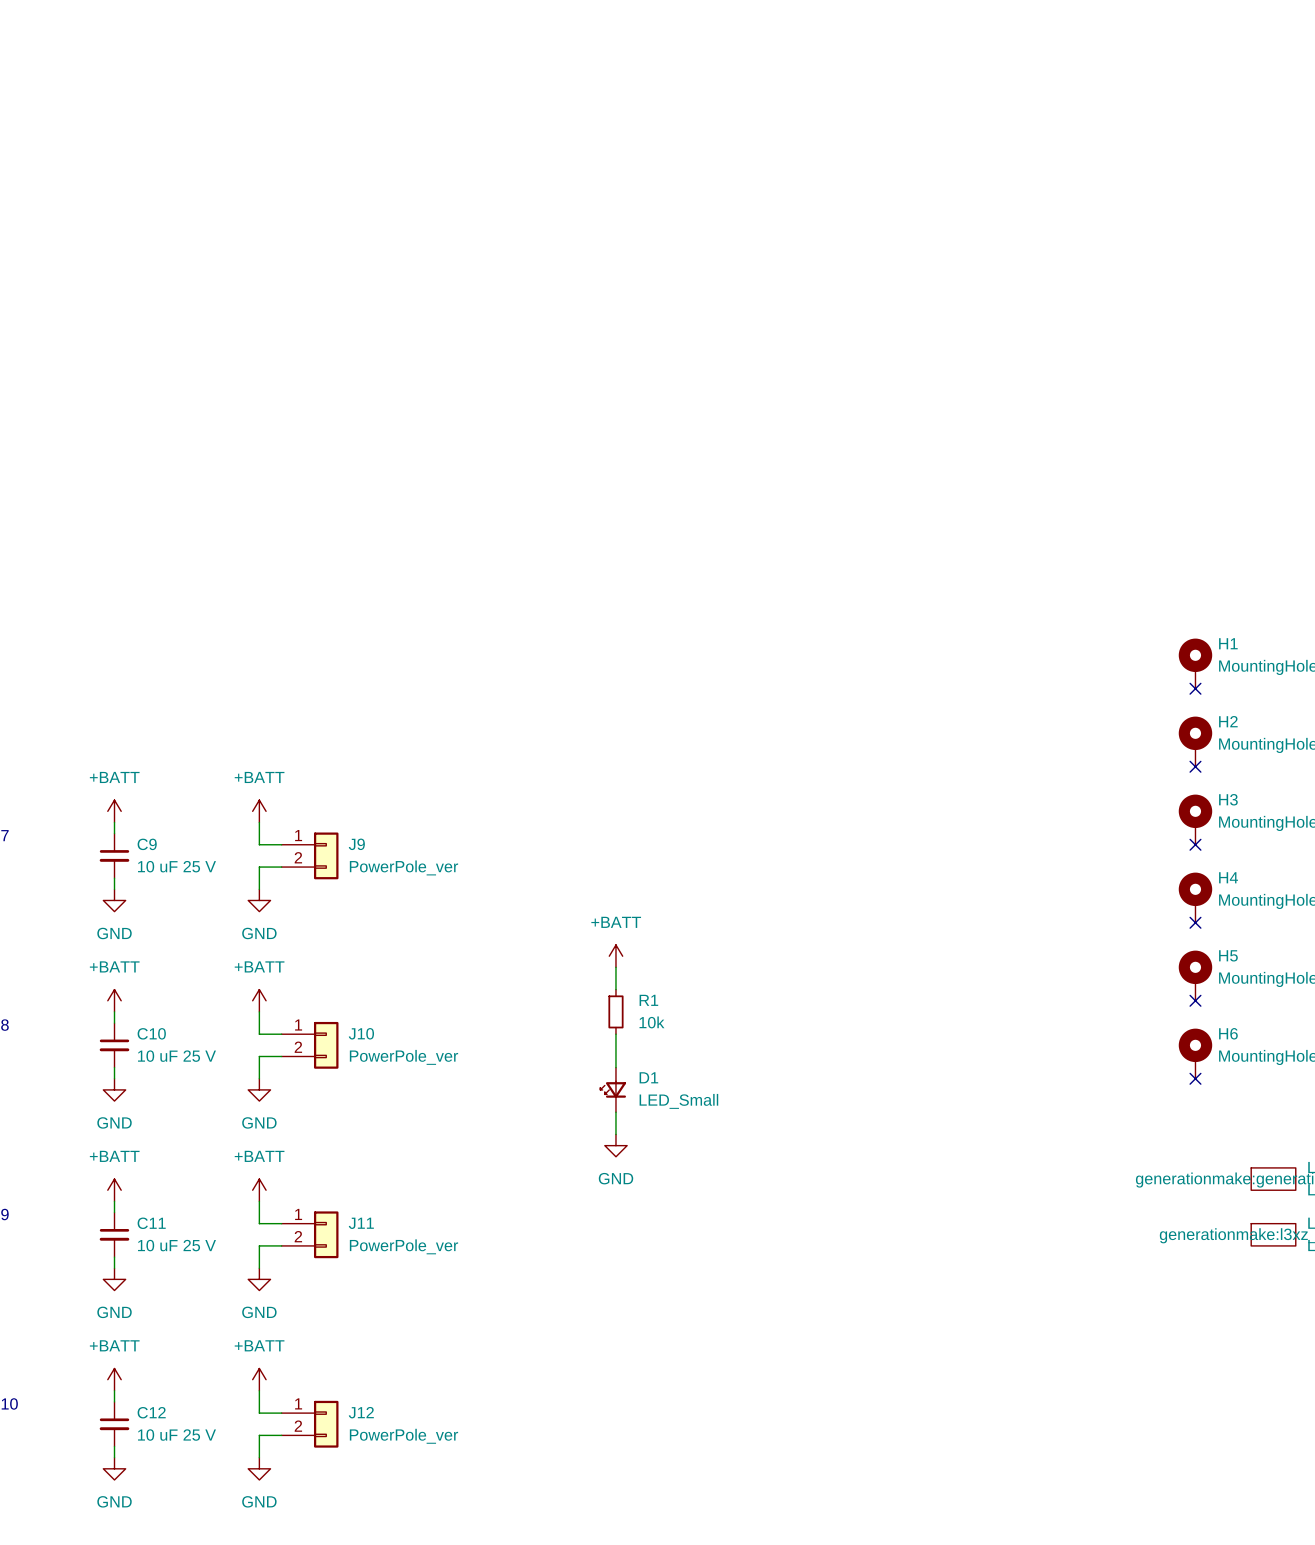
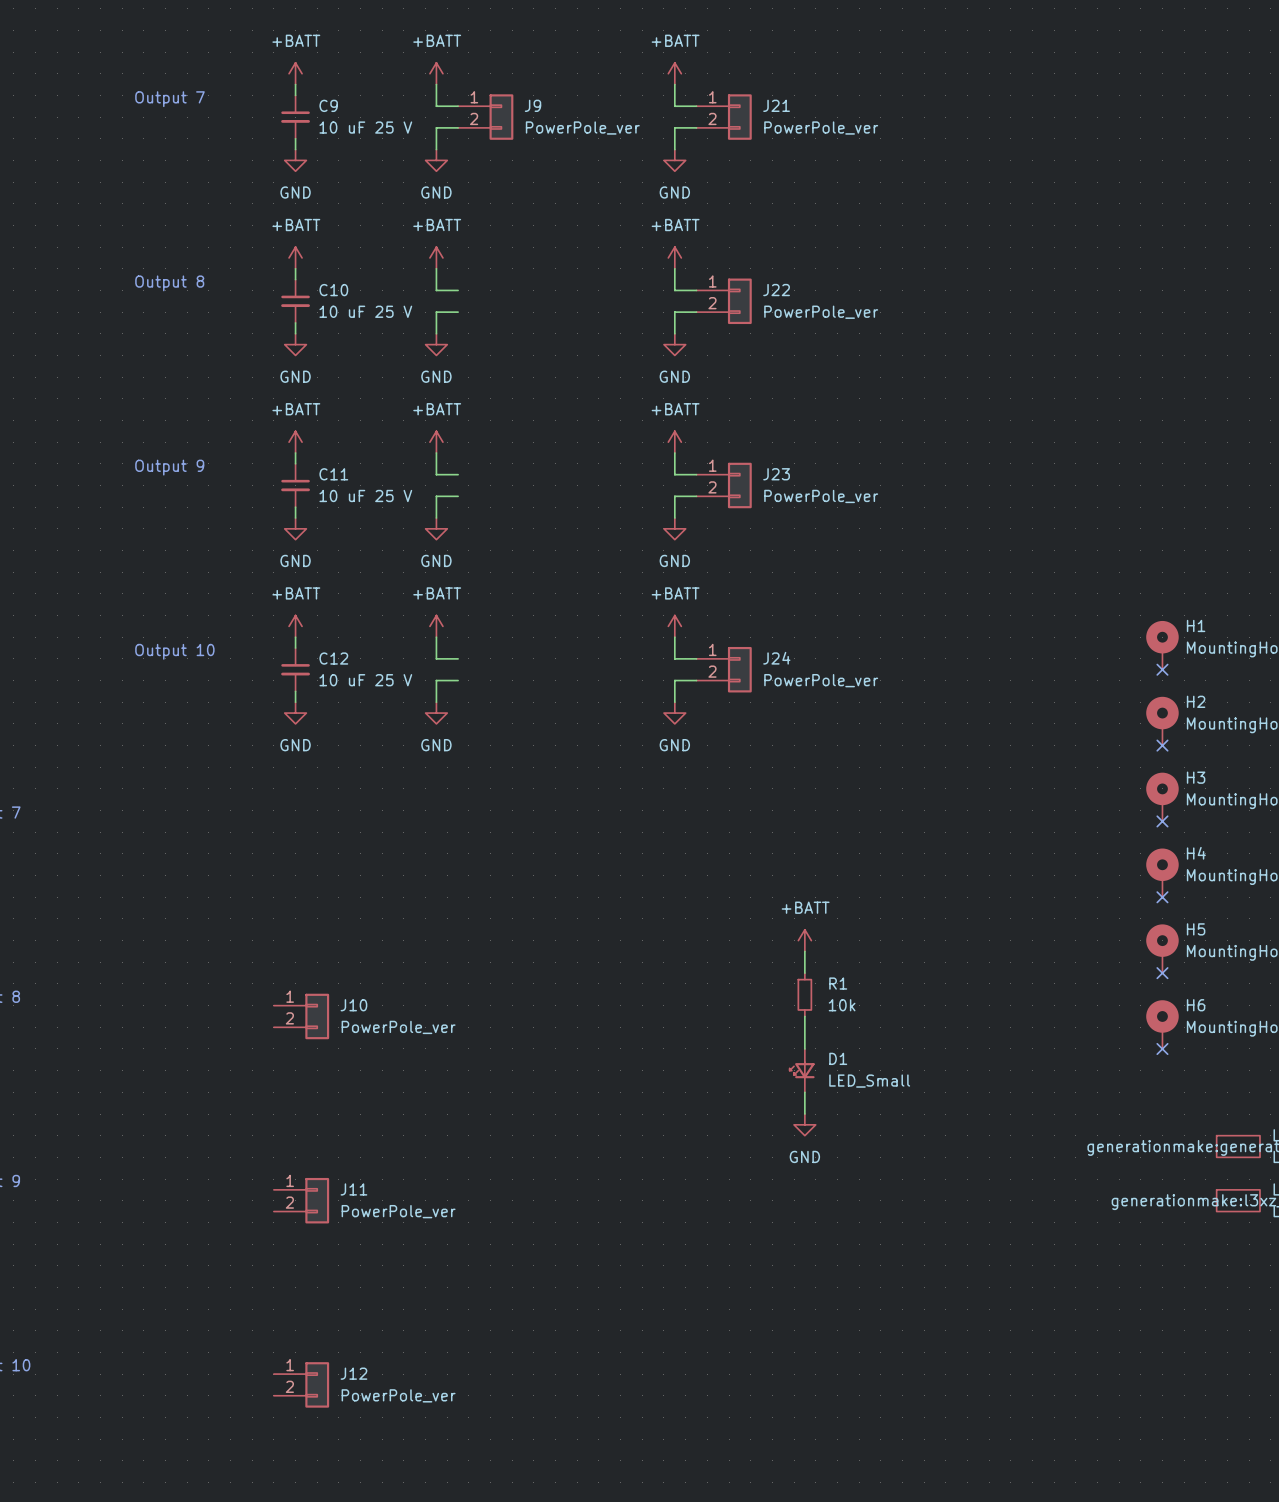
power symbol: none -> +BATT (295, 73)
power symbol: none -> +BATT (436, 73)
power symbol: none -> +BATT (674, 73)
wire: none -> (295, 84) (295, 95)
wire: none -> (436, 84) (436, 106) (458, 106)
wire: none -> (674, 84) (674, 106) (696, 106)
text: none -> Output 7 (169, 99)
J21: none -> PowerPole_ver (724, 117)
wire: none -> (458, 127) (436, 127) (436, 149)
wire: none -> (696, 127) (674, 127) (674, 149)
wire: none -> (295, 138) (295, 149)
power symbol: none -> GND (295, 160)
power symbol: none -> GND (436, 160)
power symbol: none -> GND (674, 160)
power symbol: none -> +BATT (295, 257)
power symbol: none -> +BATT (436, 257)
power symbol: none -> +BATT (674, 257)
wire: none -> (295, 268) (295, 279)
wire: none -> (436, 268) (436, 290) (458, 290)
wire: none -> (674, 268) (674, 290) (696, 290)
text: none -> Output 8 (169, 283)
J22: none -> PowerPole_ver (724, 301)
wire: none -> (458, 312) (436, 312) (436, 333)
wire: none -> (696, 312) (674, 312) (674, 333)
wire: none -> (295, 322) (295, 333)
power symbol: none -> GND (295, 344)
power symbol: none -> GND (436, 344)
power symbol: none -> GND (674, 344)
power symbol: none -> +BATT (295, 442)
power symbol: none -> +BATT (436, 442)
power symbol: none -> +BATT (674, 442)
wire: none -> (295, 452) (295, 463)
wire: none -> (436, 452) (436, 474) (458, 474)
wire: none -> (674, 452) (674, 474) (696, 474)
text: none -> Output 9 (169, 467)
J23: none -> PowerPole_ver (724, 485)
wire: none -> (458, 496) (436, 496) (436, 518)
wire: none -> (696, 496) (674, 496) (674, 518)
wire: none -> (295, 507) (295, 518)
power symbol: none -> GND (295, 528)
power symbol: none -> GND (436, 528)
power symbol: none -> GND (674, 528)
power symbol: none -> +BATT (295, 626)
power symbol: none -> +BATT (436, 626)
power symbol: none -> +BATT (674, 626)
wire: none -> (295, 637) (295, 648)
wire: none -> (436, 637) (436, 658) (458, 658)
wire: none -> (674, 637) (674, 658) (696, 658)
text: none -> Output 10 (174, 651)
J24: none -> PowerPole_ver (724, 669)
wire: none -> (458, 680) (436, 680) (436, 702)
wire: none -> (696, 680) (674, 680) (674, 702)
wire: none -> (295, 691) (295, 702)
power symbol: none -> GND (295, 713)
power symbol: none -> GND (436, 713)
power symbol: none -> GND (674, 713)
power symbol: +BATT (114, 811) -> none
power symbol: +BATT (259, 811) -> none
wire: (114, 822) (114, 833) -> none
wire: (259, 822) (259, 844) (281, 844) -> none
C9 position: (114, 855) -> (295, 117)
J9 position: (310, 855) -> (485, 117)
wire: (281, 867) (259, 867) (259, 889) -> none
wire: (114, 878) (114, 889) -> none
power symbol: GND (114, 900) -> none
power symbol: GND (259, 900) -> none
power symbol: +BATT (615, 956) -> none
wire: (615, 967) (615, 989) -> (804, 951) (804, 973)
power symbol: none -> +BATT (804, 940)
power symbol: +BATT (114, 1000) -> none
power symbol: +BATT (259, 1000) -> none
wire: (114, 1011) (114, 1023) -> none
wire: (259, 1011) (259, 1034) (281, 1034) -> none
R1 position: (615, 1011) -> (804, 994)
wire: (615, 1034) (615, 1067) -> (804, 1016) (804, 1048)
C10 position: (114, 1045) -> (295, 301)
wire: (281, 1056) (259, 1056) (259, 1078) -> none
wire: (114, 1067) (114, 1078) -> none
power symbol: GND (114, 1089) -> none
power symbol: GND (259, 1089) -> none
D1 position: (613, 1089) -> (802, 1070)
wire: (615, 1112) (615, 1134) -> (804, 1092) (804, 1114)
power symbol: GND (615, 1145) -> none
power symbol: none -> GND (804, 1124)
power symbol: +BATT (114, 1190) -> none
power symbol: +BATT (259, 1190) -> none
wire: (114, 1201) (114, 1212) -> none
wire: (259, 1201) (259, 1223) (281, 1223) -> none
C11 position: (114, 1234) -> (295, 485)
wire: (281, 1245) (259, 1245) (259, 1268) -> none
wire: (114, 1257) (114, 1268) -> none
power symbol: GND (114, 1279) -> none
power symbol: GND (259, 1279) -> none
power symbol: +BATT (114, 1379) -> none
power symbol: +BATT (259, 1379) -> none
wire: (114, 1390) (114, 1401) -> none
wire: (259, 1390) (259, 1413) (281, 1413) -> none
C12 position: (114, 1424) -> (295, 669)
wire: (281, 1435) (259, 1435) (259, 1457) -> none
wire: (114, 1446) (114, 1457) -> none
power symbol: GND (114, 1468) -> none
power symbol: GND (259, 1468) -> none

